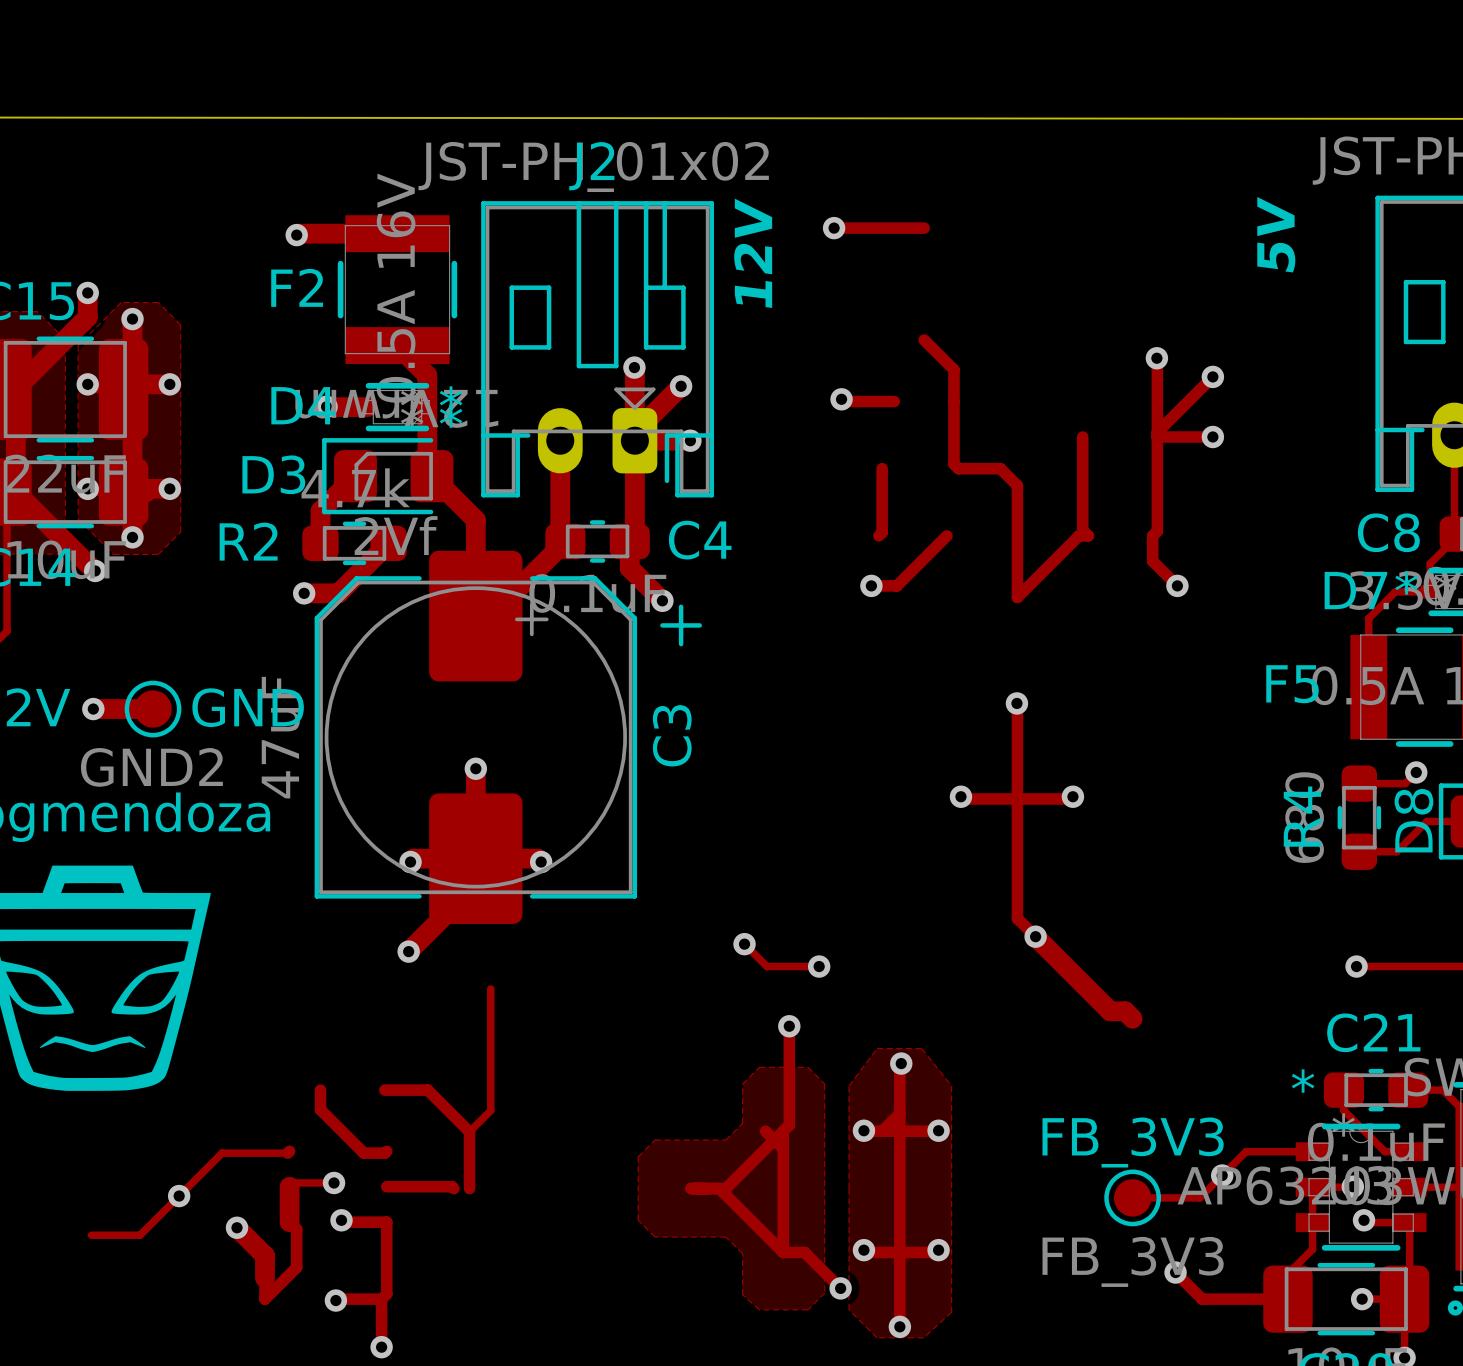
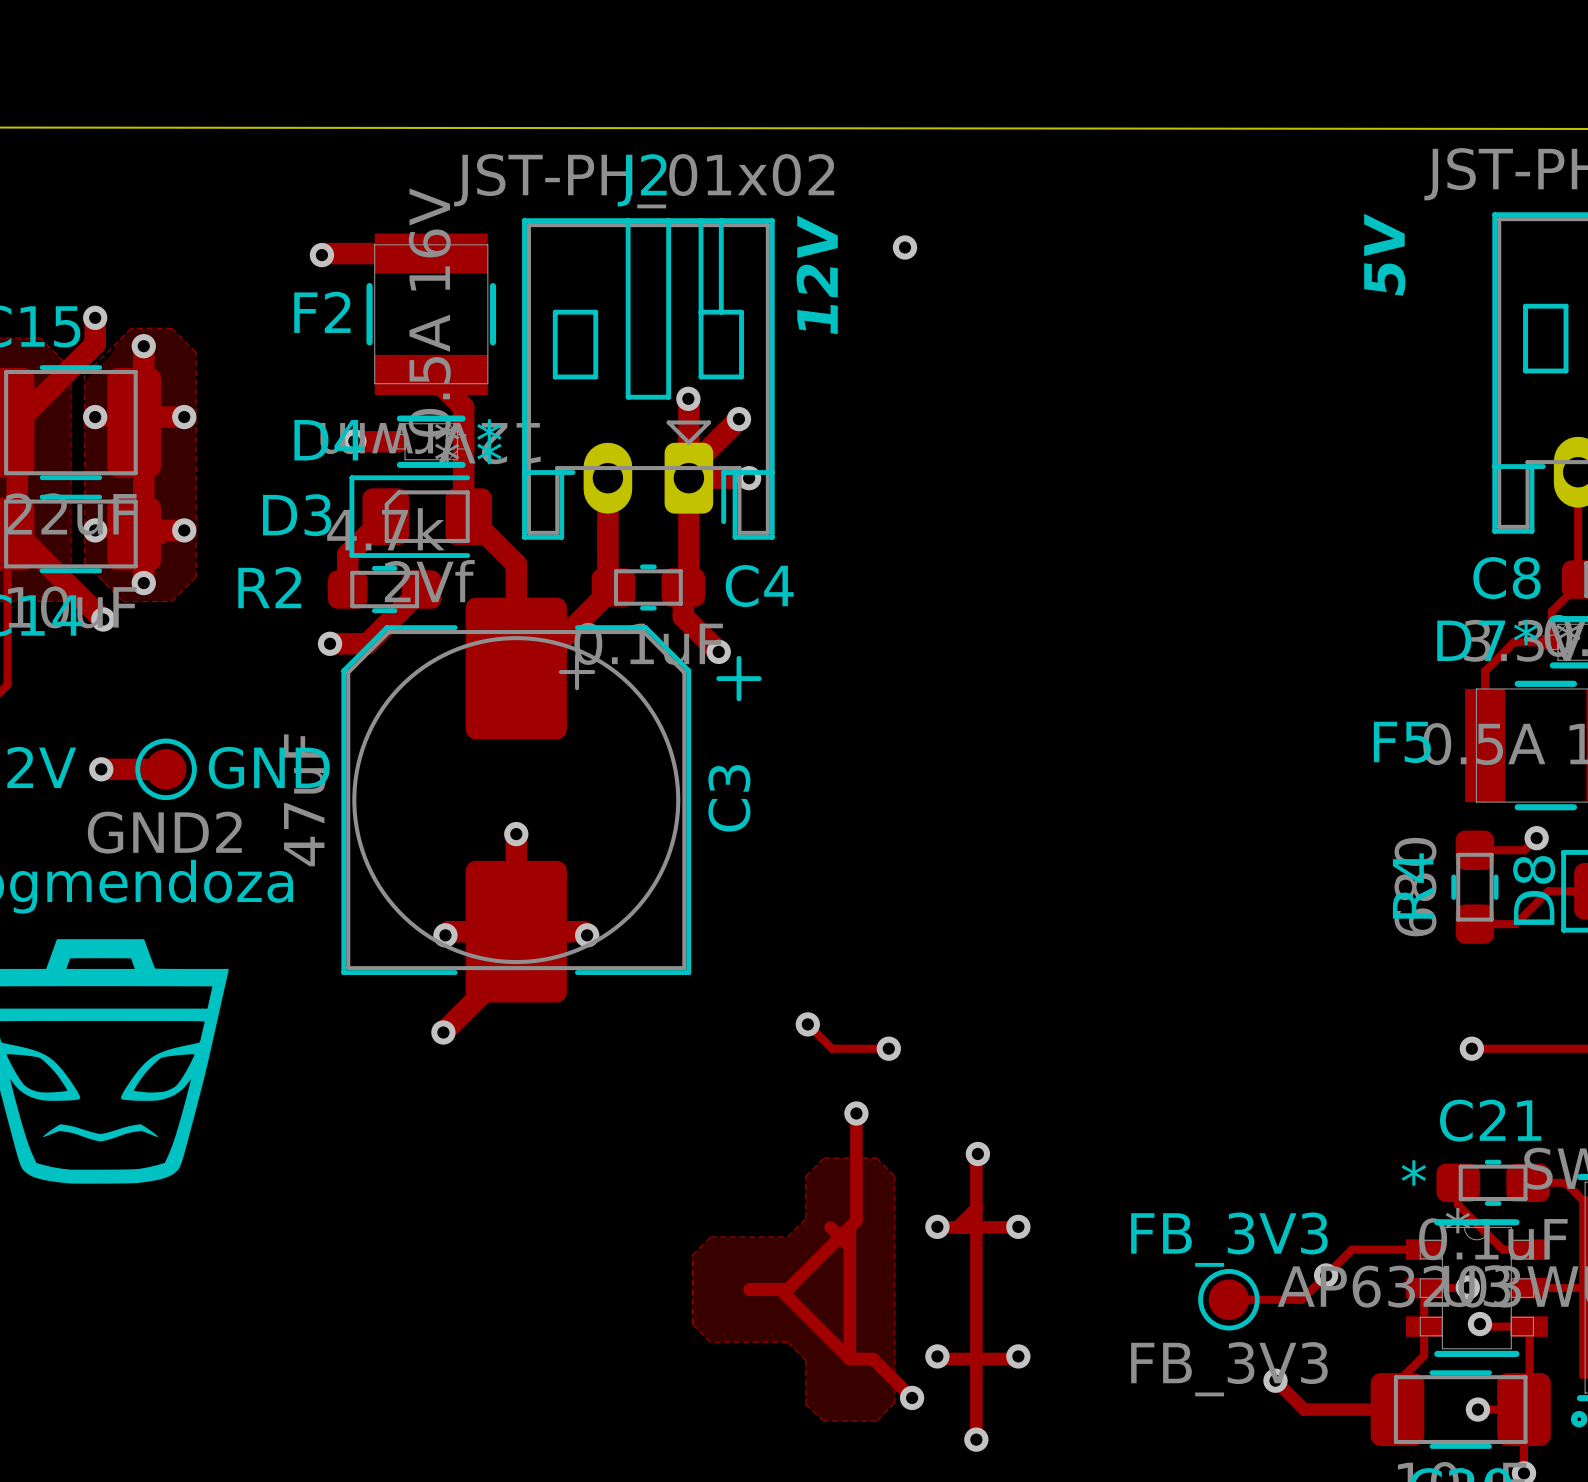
track: (834, 228) (924, 228) -> none
track: (924, 339) (953, 369) (953, 464) (958, 468) (1000, 468) (1017, 485) (1017, 597) (1078, 535) (1088, 535) (1082, 530) (1082, 436) -> none
via: (1156, 358) -> none
track: (1157, 358) (1157, 531) (1152, 535) (1152, 561) (1177, 585) -> none
track: (1212, 376) (1157, 432) -> none
via: (1212, 376) -> none
track: (841, 399) (843, 401) (894, 401) -> none
via: (841, 399) -> none
track: (1157, 436) (1212, 436) -> none
via: (1212, 436) -> none
track: (882, 468) (882, 532) (878, 535) -> none
track: (946, 535) (896, 585) (871, 585) -> none
via: (871, 585) -> none
via: (1177, 585) -> none
via: (1016, 703) -> none
track: (1017, 703) (1017, 918) (1110, 1011) (1125, 1011) (1132, 1018) -> none
track: (960, 796) (963, 798) (1070, 798) (1072, 796) -> none
via: (960, 796) -> none
via: (1072, 796) -> none
via: (1035, 936) -> none
track: (490, 988) (490, 1110) (469, 1131) -> none
zone outline: (877, 1048) (849, 1085) (849, 1309) (877, 1337) (923, 1337) (951, 1312) (951, 1085) (921, 1048) (877, 1048) -> none
track: (320, 1090) (320, 1109) (363, 1153) (384, 1153) (386, 1151) -> none
track: (384, 1090) (427, 1090) (469, 1131) -> none
track: (469, 1131) (469, 1188) -> none
track: (289, 1151) (287, 1153) (222, 1153) (139, 1235) (91, 1235) -> none
track: (334, 1182) (293, 1182) (289, 1186) (289, 1222) (296, 1229) (296, 1267) (264, 1299) (264, 1255) (237, 1227) -> none
via: (334, 1182) -> none
track: (386, 1186) (452, 1186) (453, 1188) -> none
via: (179, 1196) -> none
track: (341, 1220) (343, 1222) (386, 1222) (386, 1294) (381, 1299) -> none
via: (341, 1220) -> none
via: (237, 1227) -> none
track: (381, 1299) (381, 1347) -> none
track: (381, 1299) (335, 1300) -> none
via: (335, 1300) -> none
via: (381, 1347) -> none

